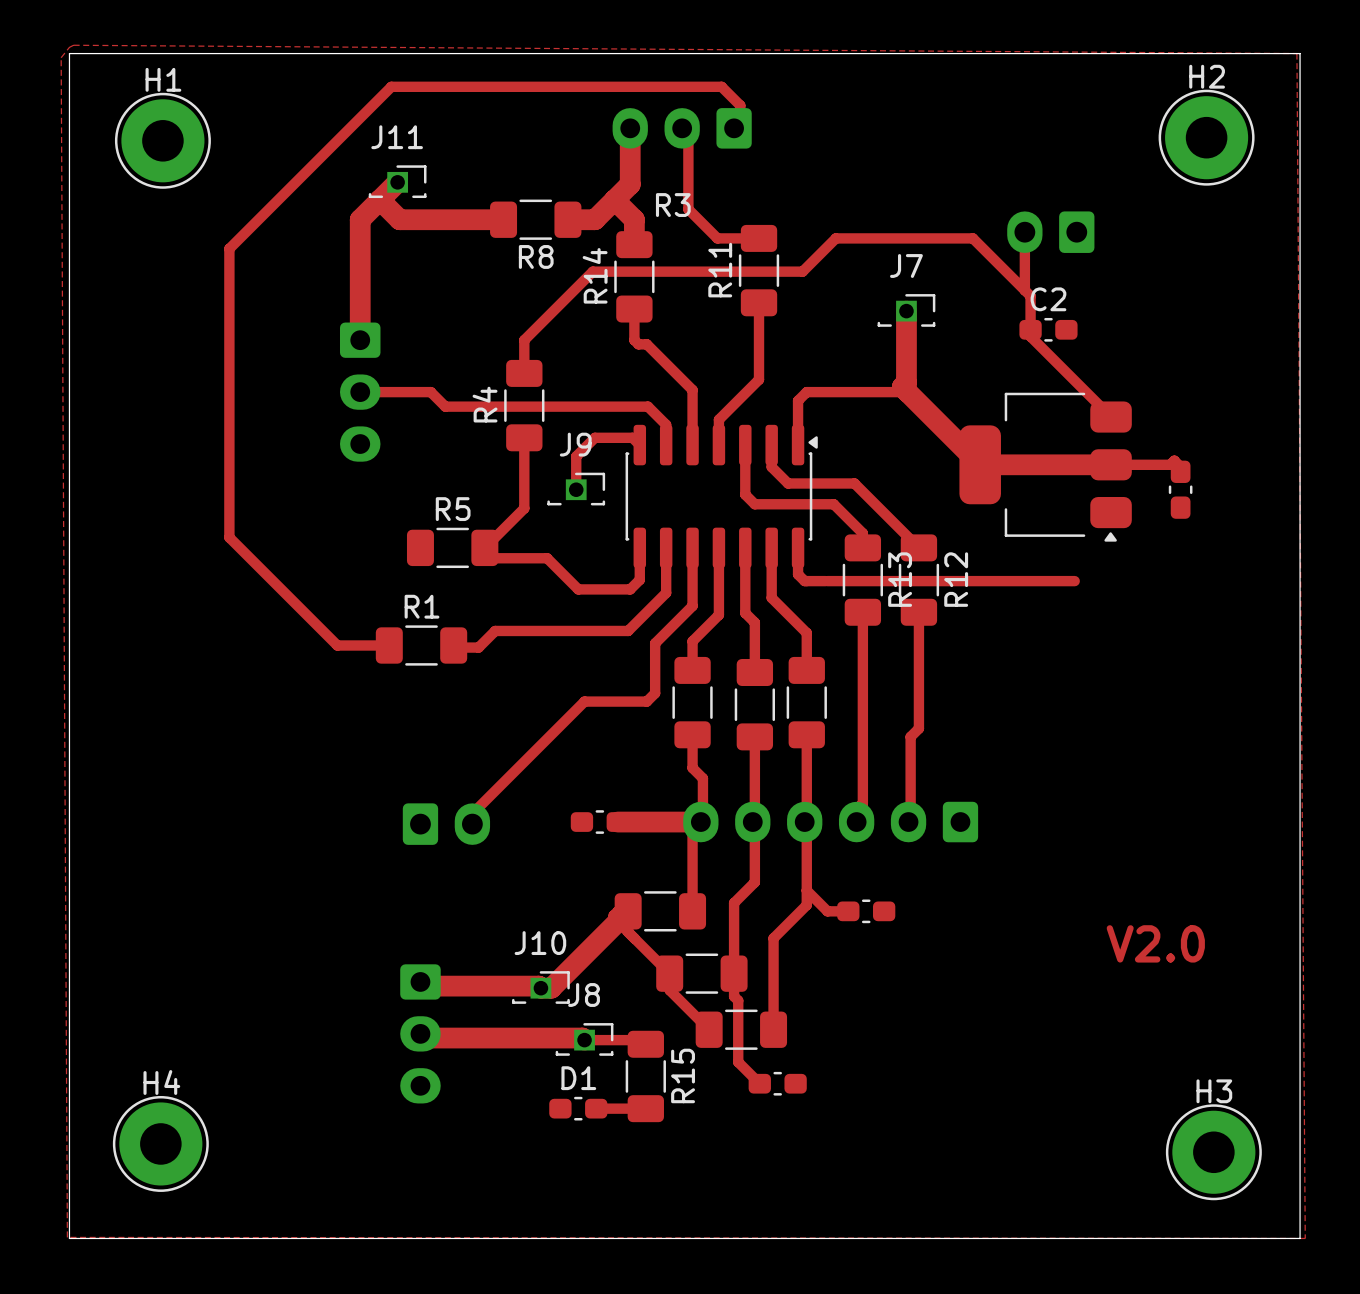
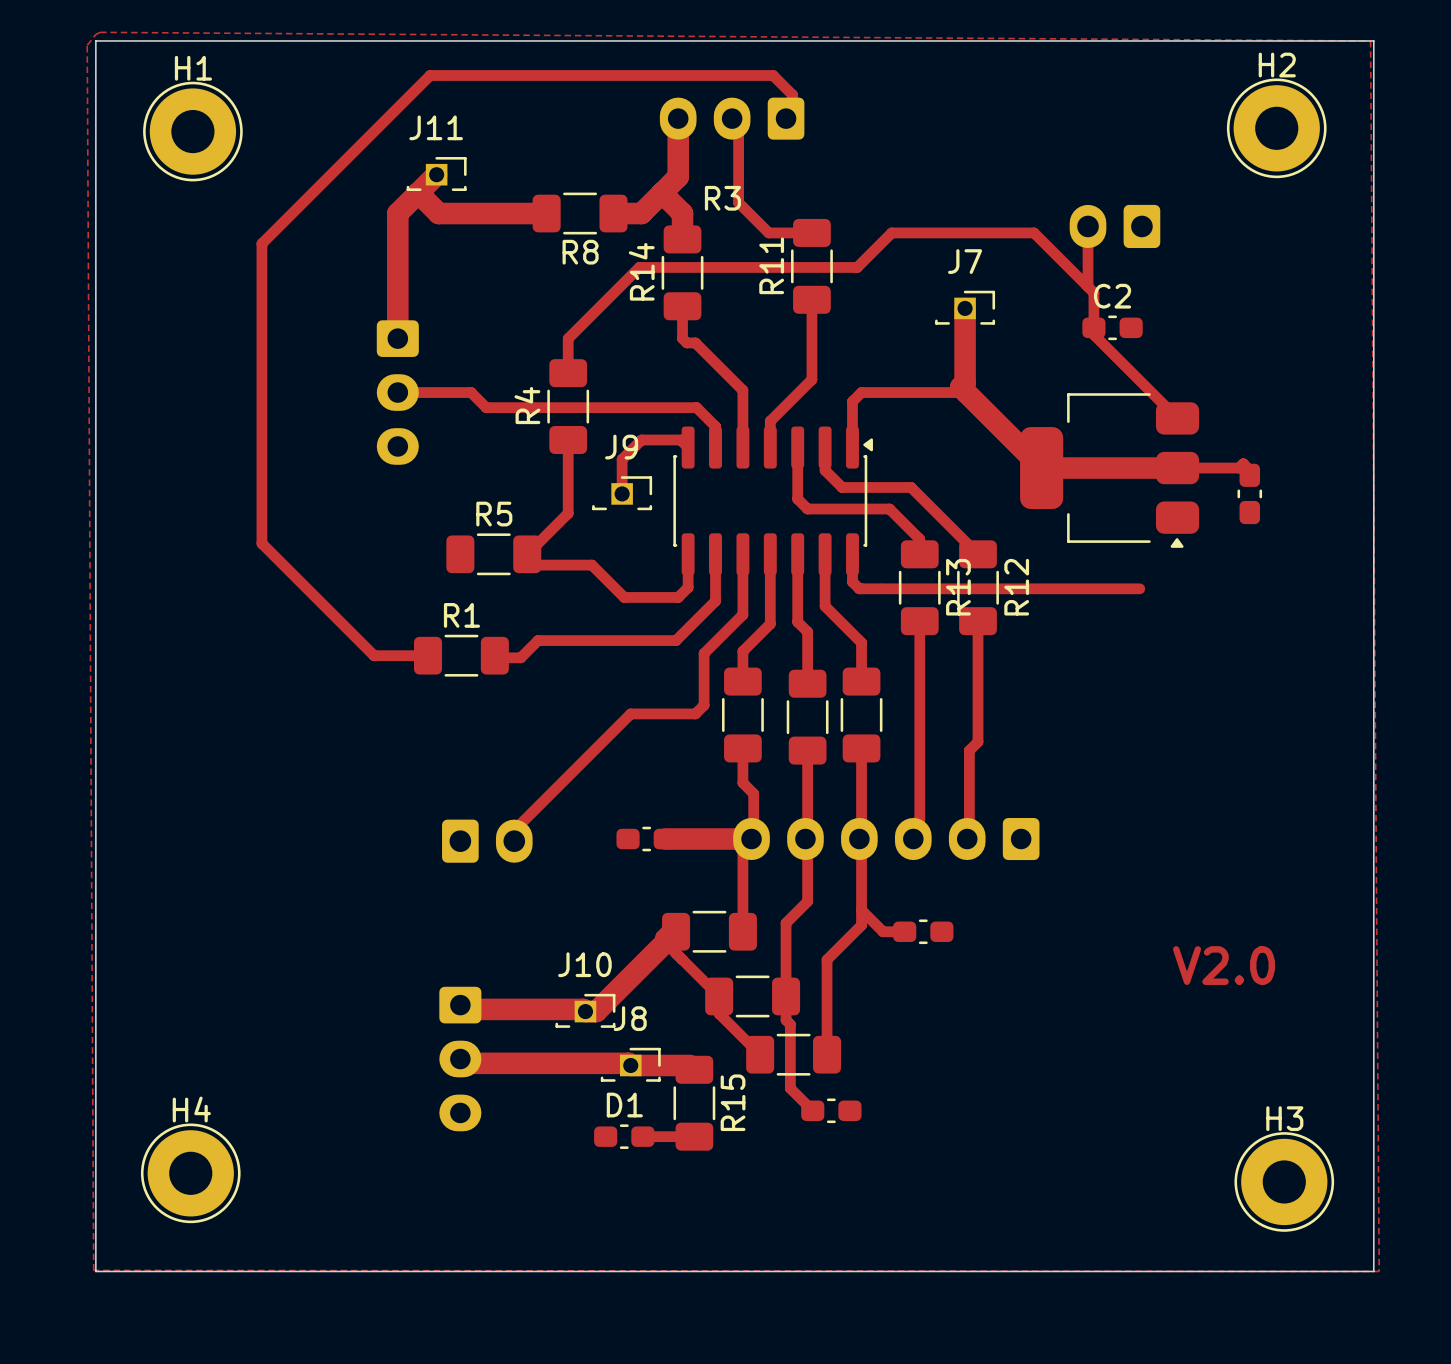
top track width: thin (584, 1040) (641, 1040) -> thick (630, 1065) (690, 1065)

